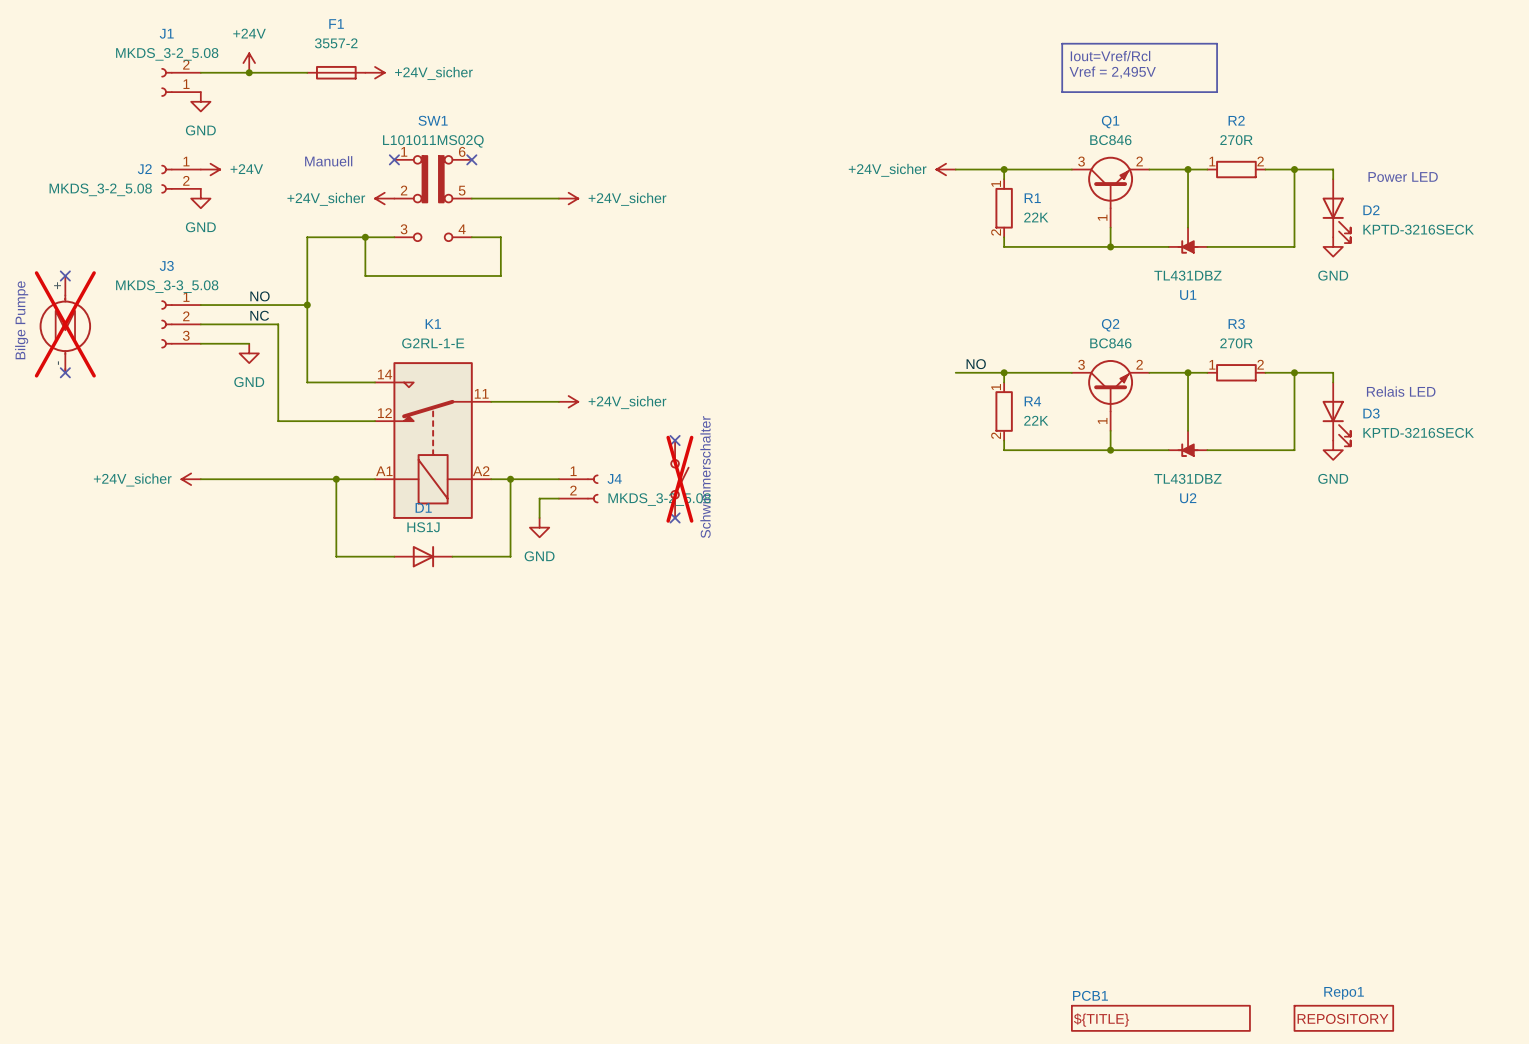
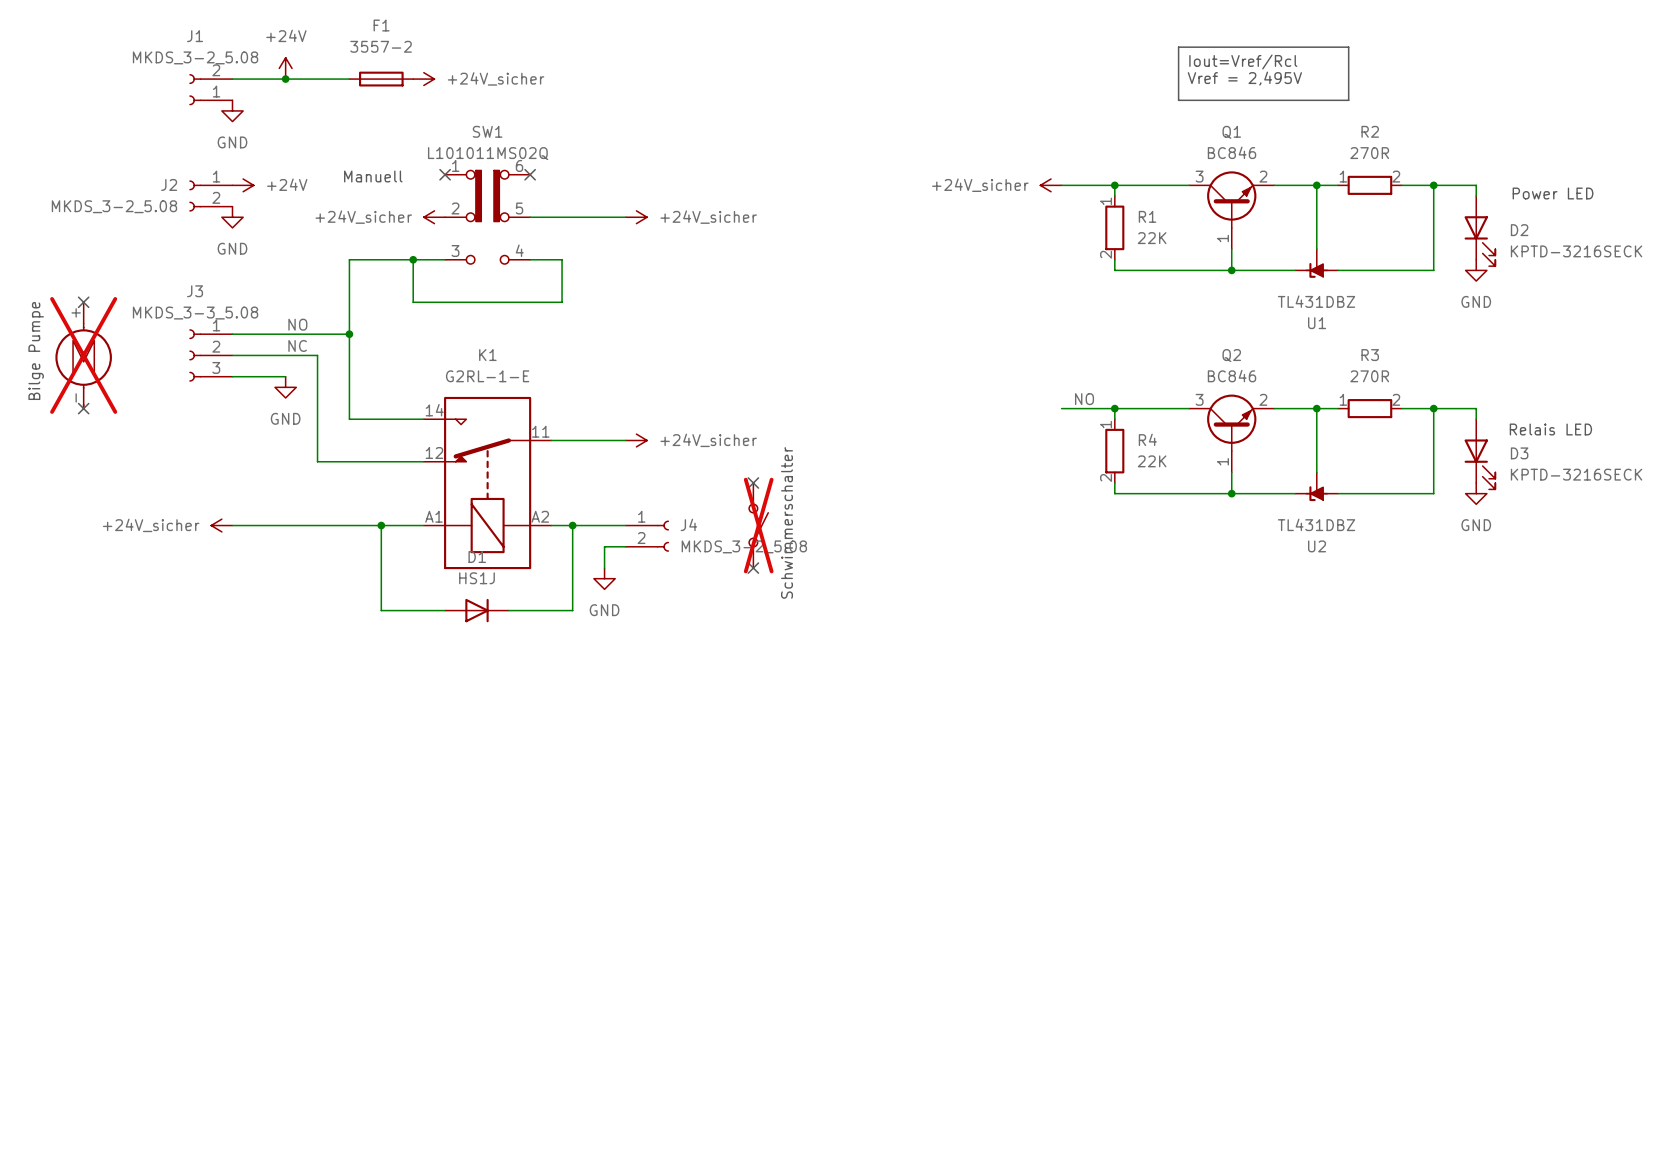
PCB1: (1160, 1018) -> none
Repo1: (1343, 1018) -> none

